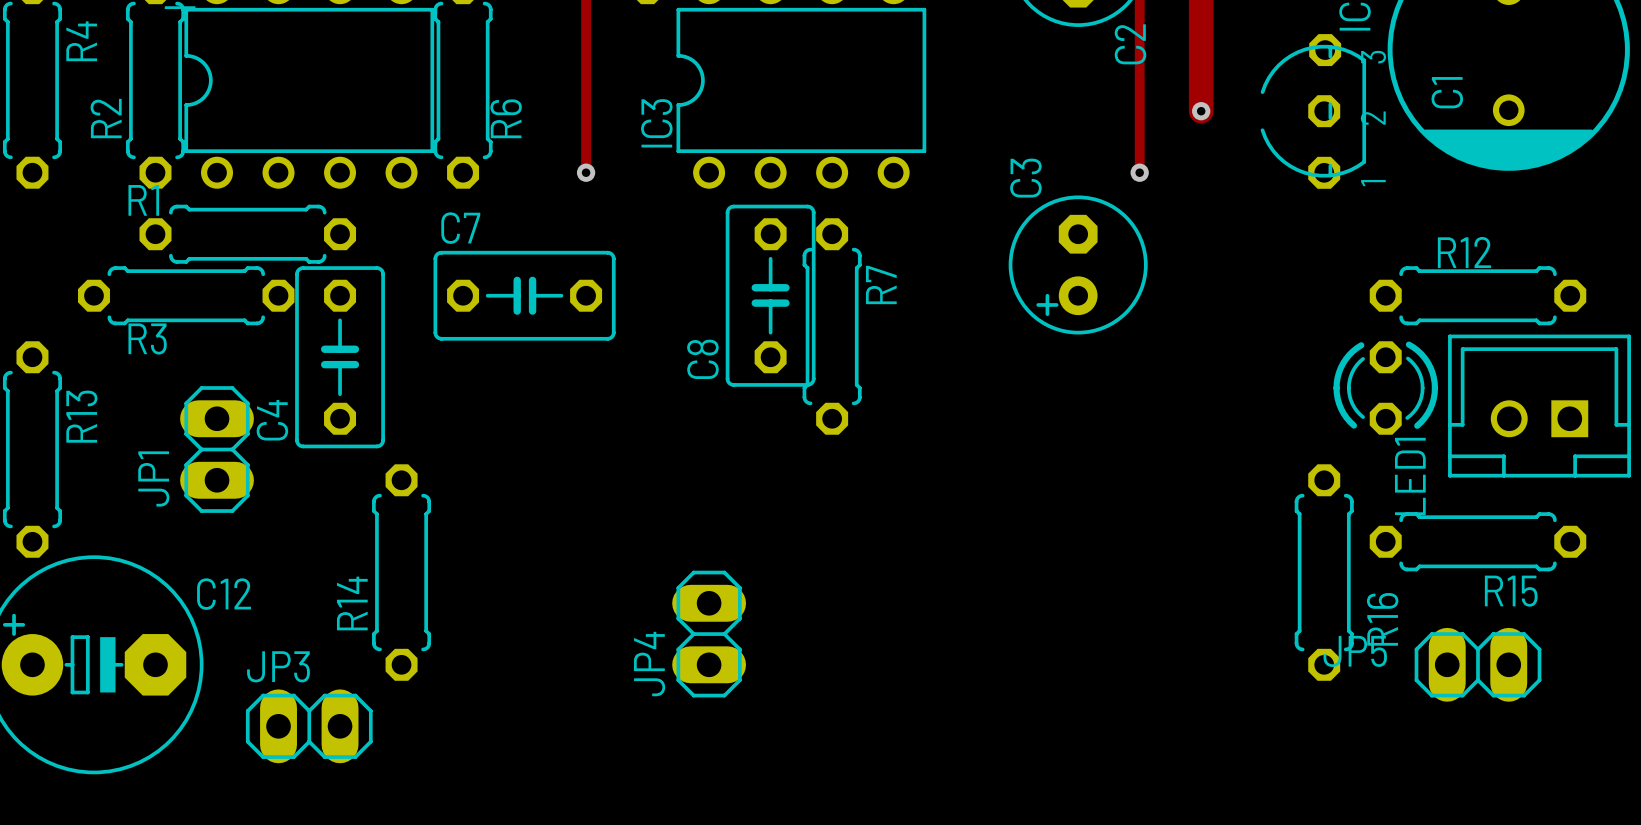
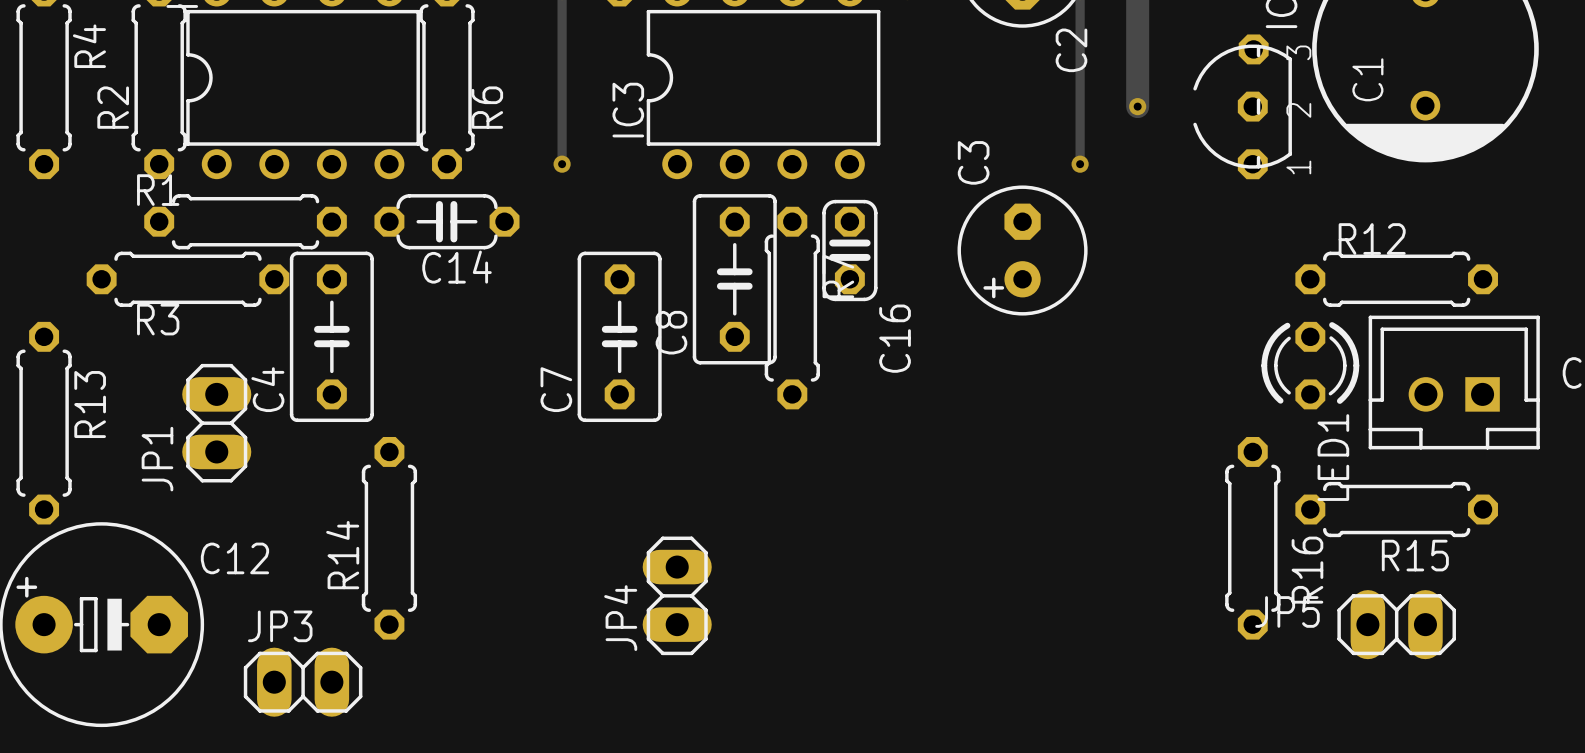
C14: none -> (446, 221)
C16: none -> (849, 250)
C7 rotation: 0° (524, 295) -> 90° counterclockwise (619, 336)
C7 position: (524, 295) -> (619, 336)

